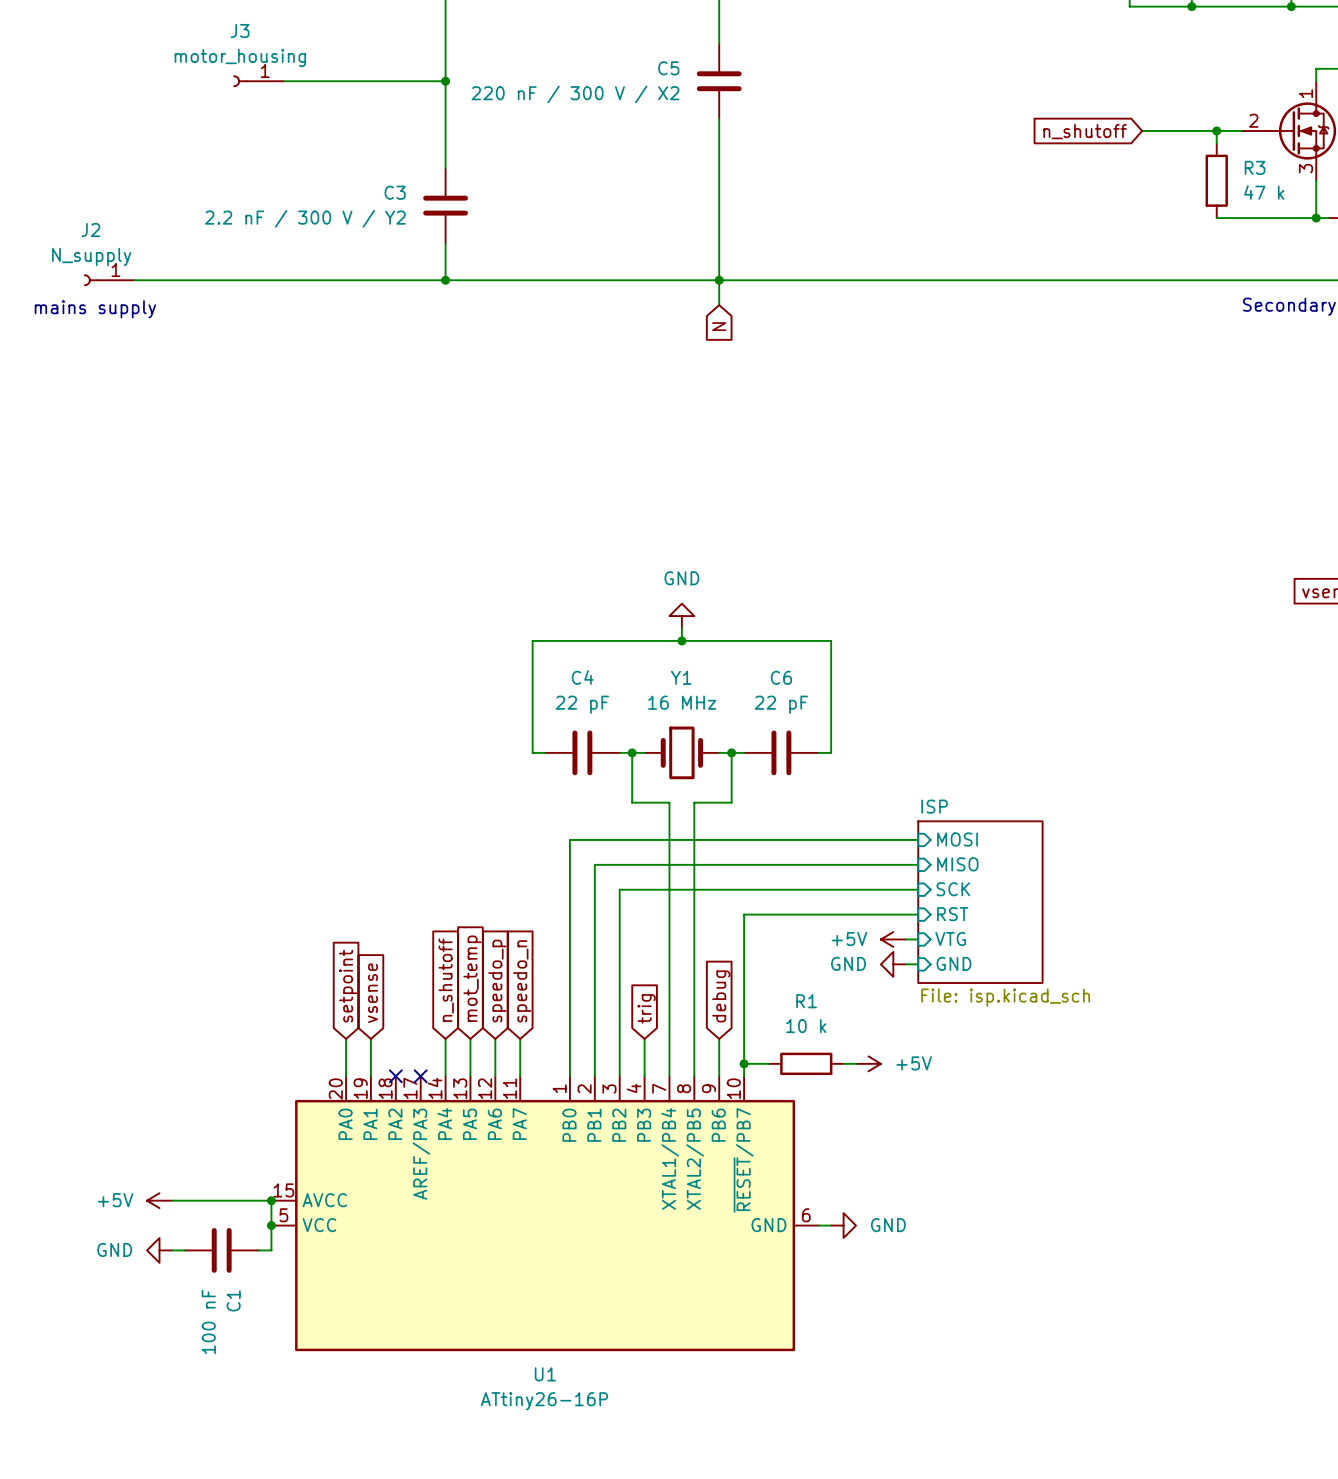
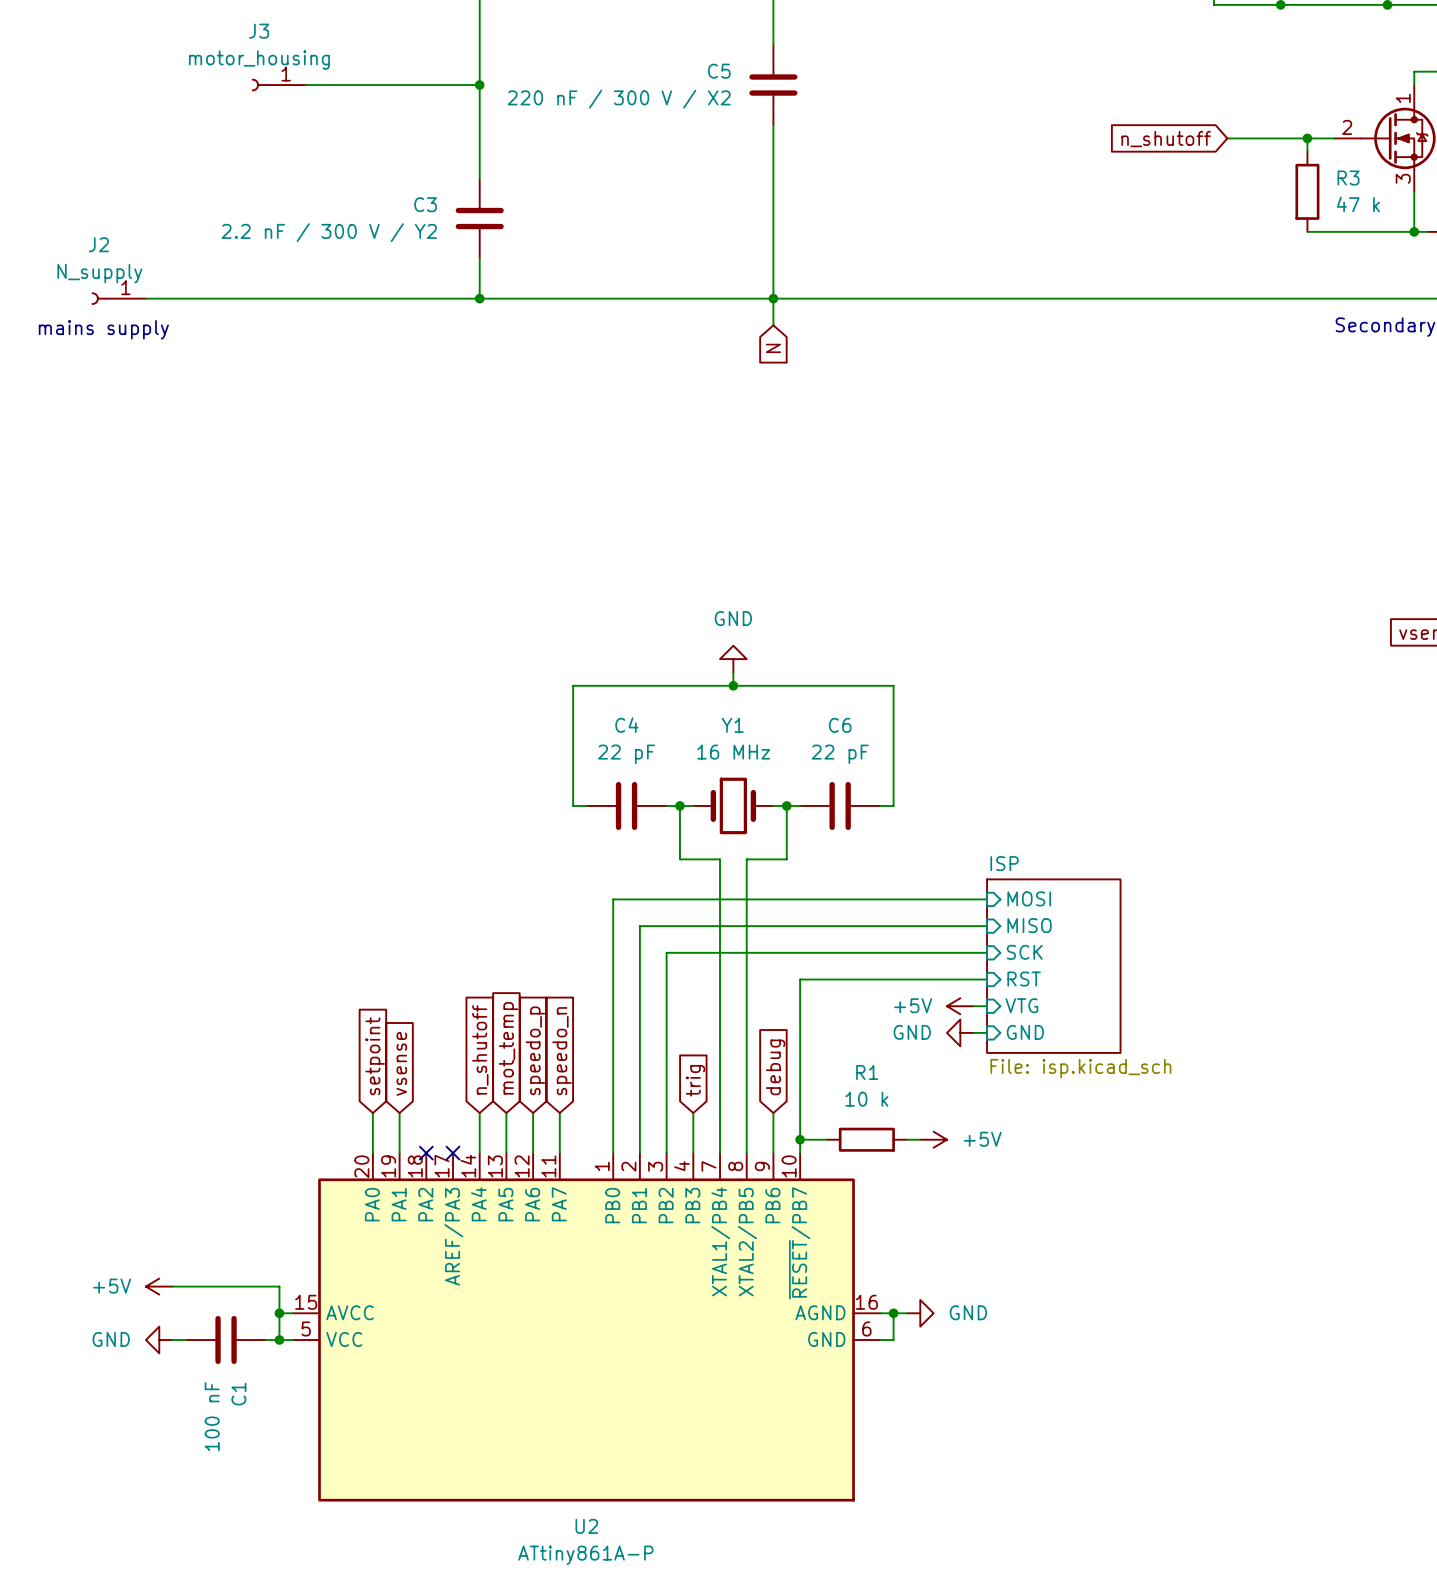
power symbol position: +5V (159, 1200) -> +5V (159, 1286)
wire: (259, 1200) (271, 1200) (271, 1250) -> (279, 1286) (279, 1339) (266, 1339)
junction: (271, 1200) -> none
U1: ATtiny26-16P (545, 1213) -> none
wire: none -> (279, 1313) (292, 1313)
junction position: (271, 1225) -> (279, 1313)
junction: none -> (893, 1313)
wire: none -> (906, 1313) (893, 1313) (893, 1339) (880, 1339)
power symbol position: GND (843, 1225) -> GND (920, 1313)
U2: none -> ATtiny861A-P (586, 1327)
power symbol position: GND (159, 1250) -> GND (159, 1339)
C1 position: (221, 1250) -> (226, 1339)
junction: none -> (279, 1339)

